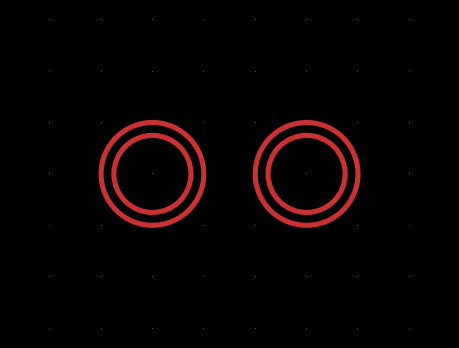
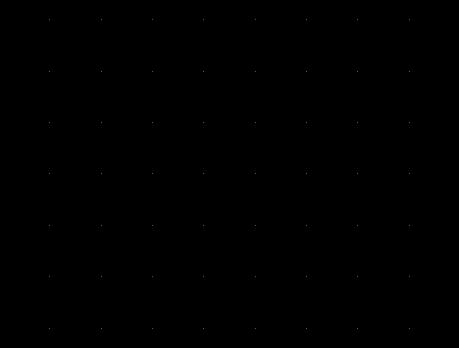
part: (152, 173) -> none
part: (306, 173) -> none

